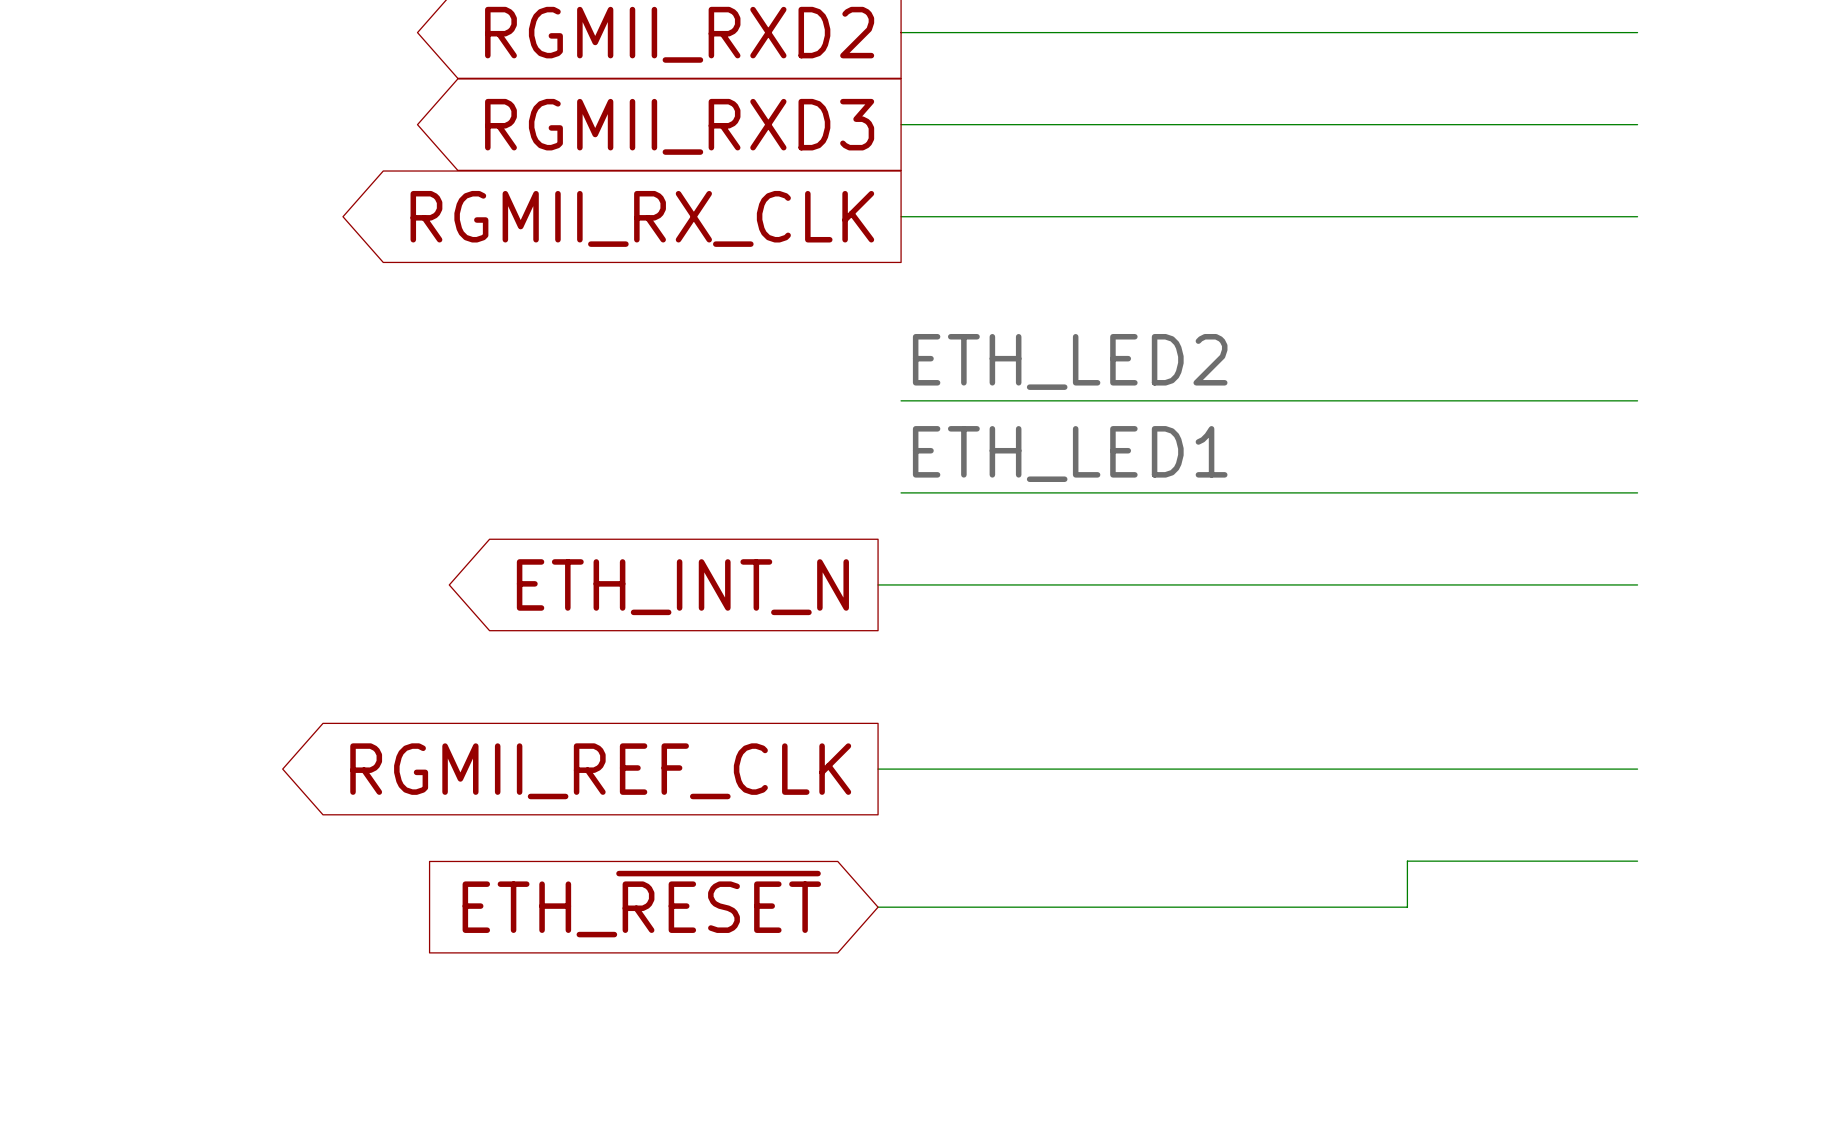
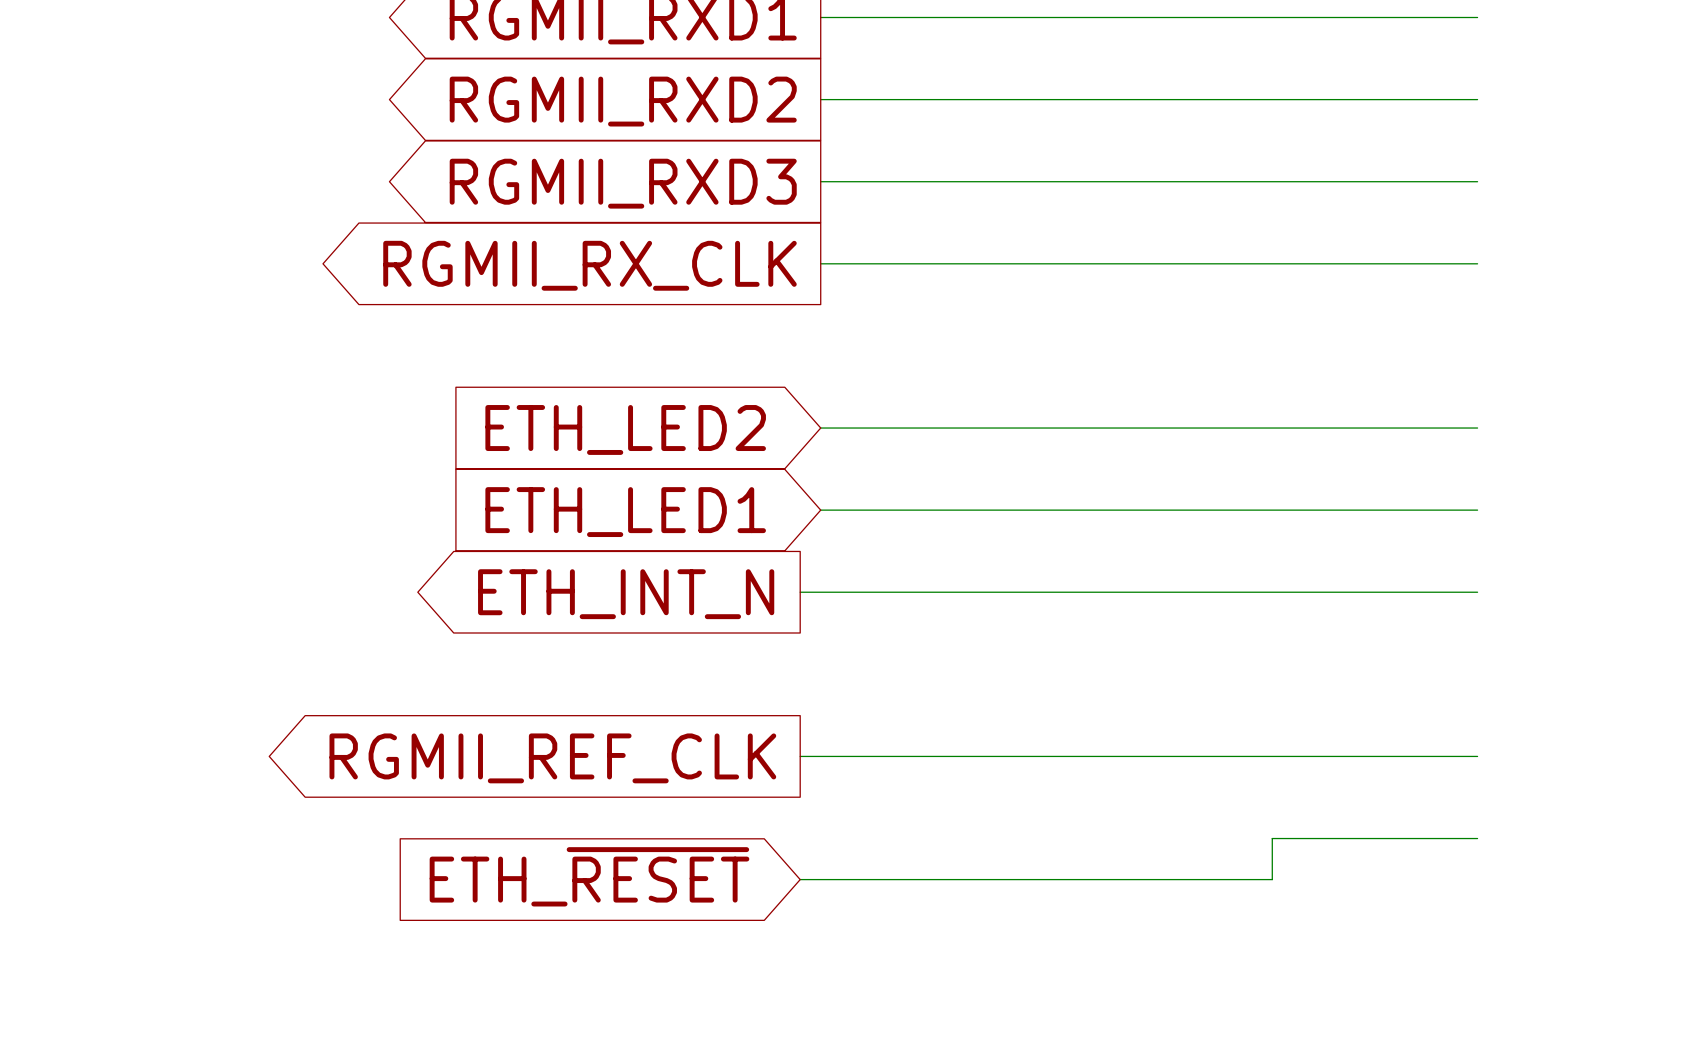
label: ETH_LED2 (1070, 361) -> none
global label: none -> ETH_LED2 (625, 429)
label: ETH_LED1 (1070, 454) -> none
global label: none -> ETH_LED1 (625, 512)

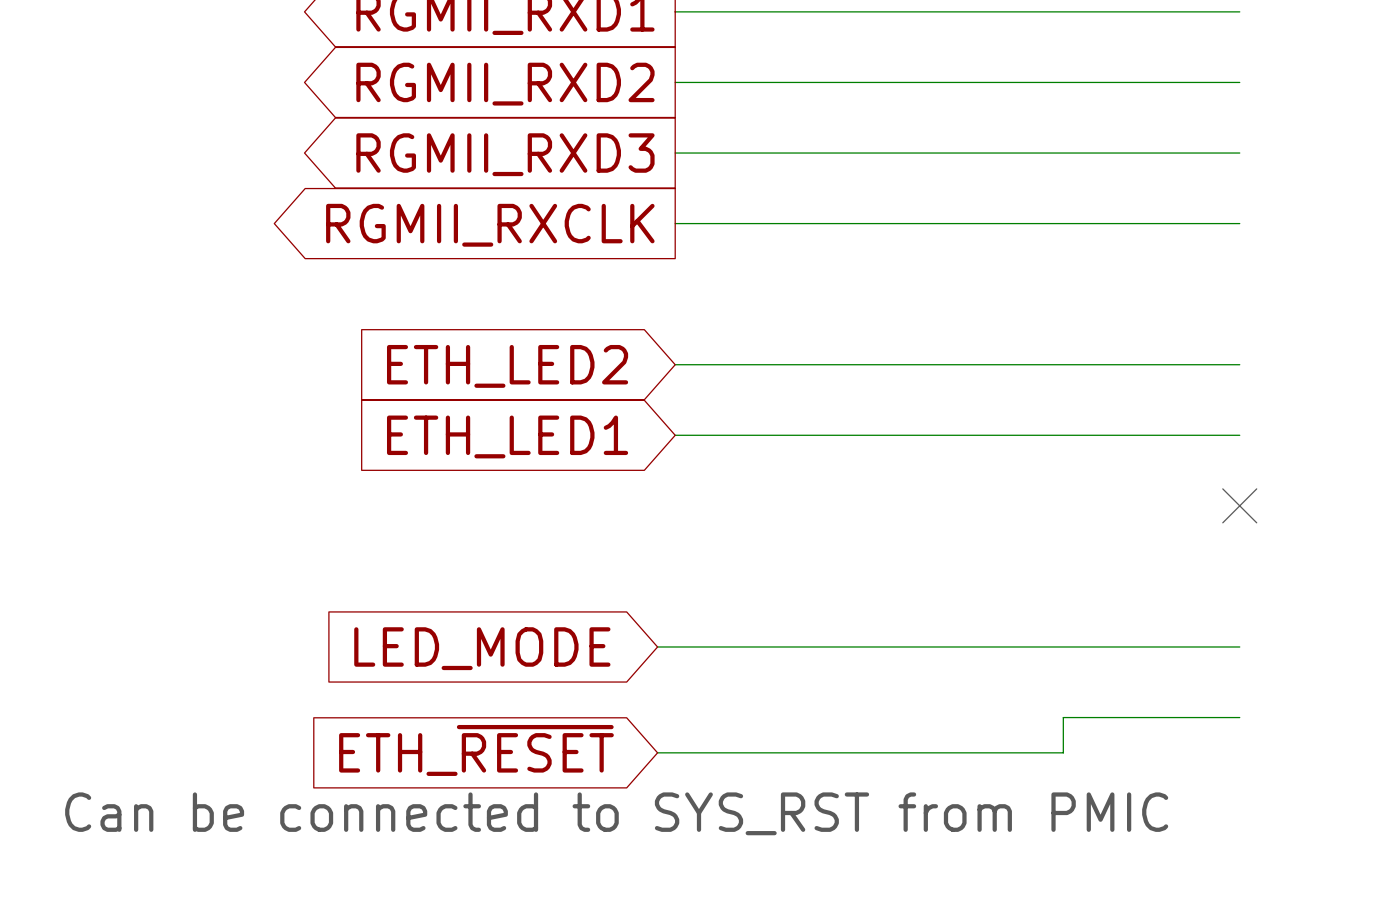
global label: RGMII_RX_CLK (589, 265) -> RGMII_RXCLK (490, 225)
wire: (800, 592) (1477, 592) -> none
no-connect mark: none -> (1239, 505)
global label: ETH_INT_N (626, 594) -> none
global label shape: output (552, 758) -> input (482, 648)
global label: RGMII_REF_CLK (552, 758) -> LED_MODE (482, 648)
text: none -> Can be connected to SYS_RST from PMIC (616, 813)

